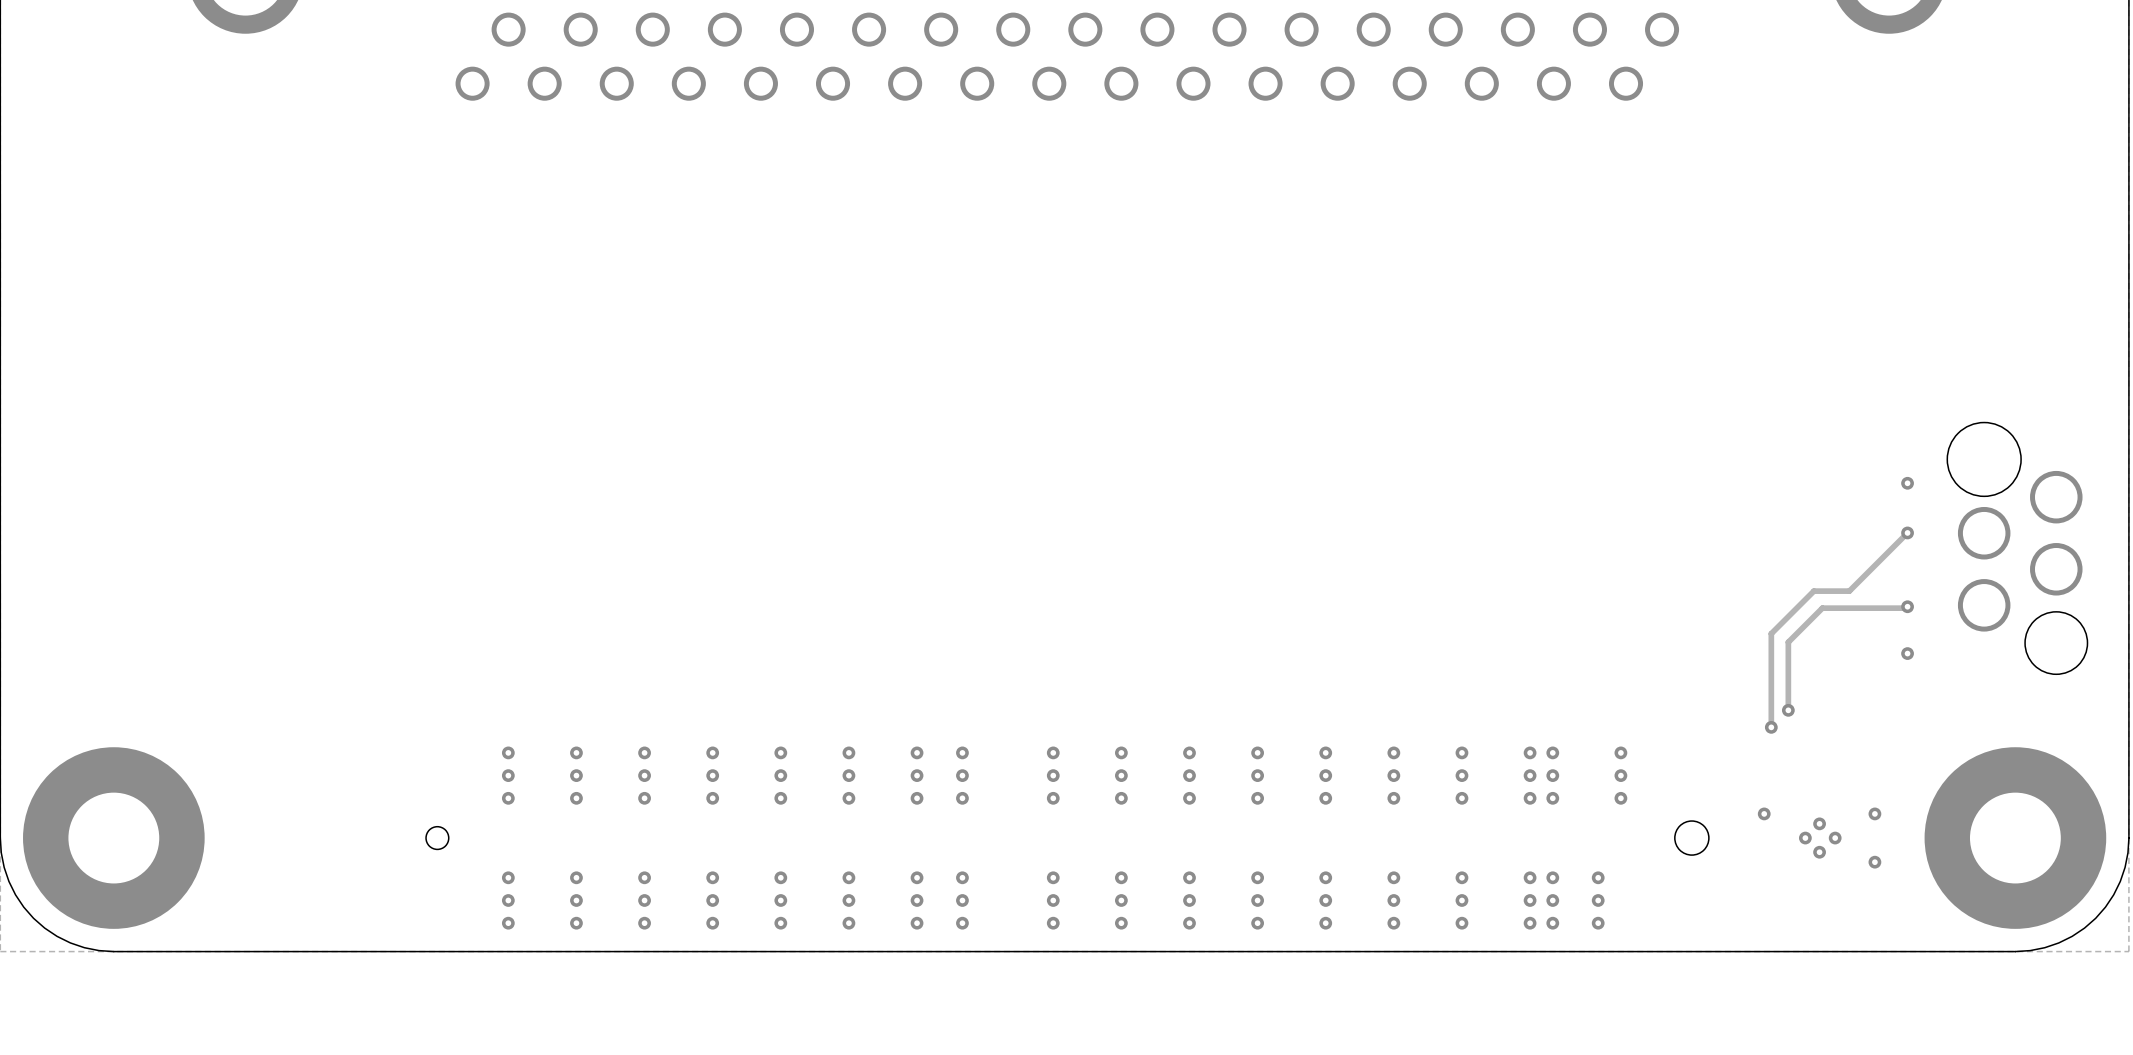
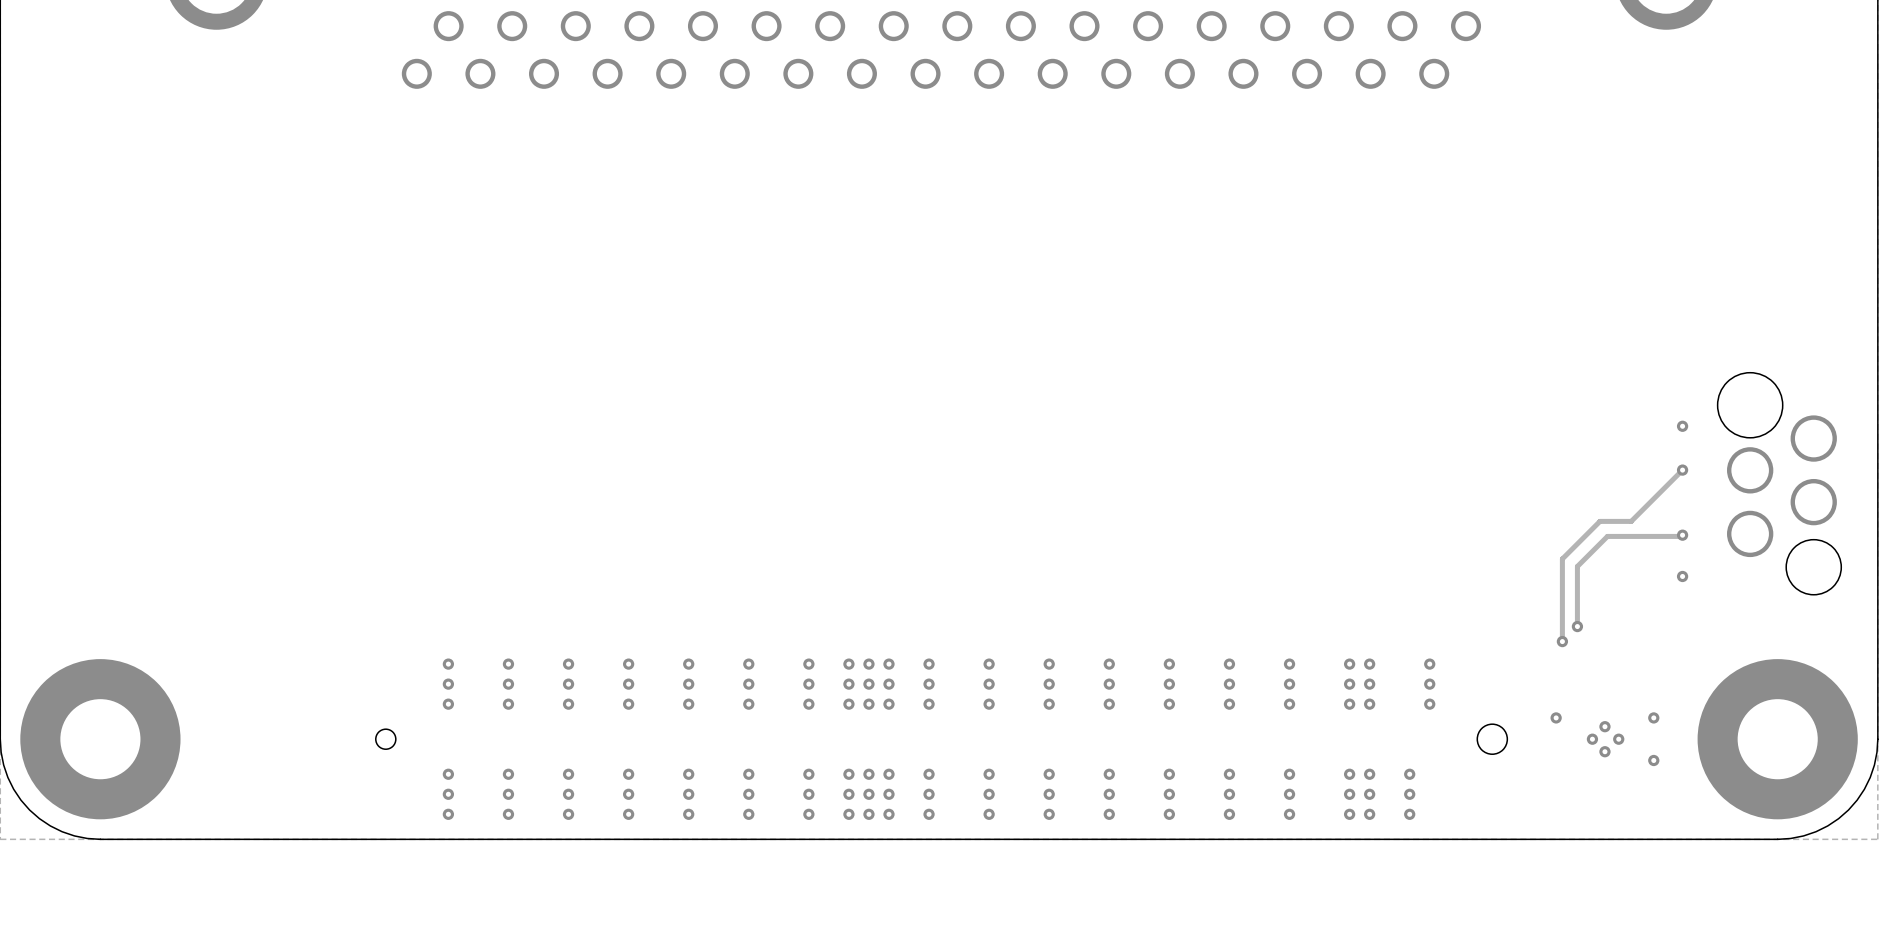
via: none -> (868, 664)
via: none -> (888, 664)
via: none -> (868, 684)
via: none -> (888, 684)
via: none -> (868, 704)
via: none -> (888, 704)
via: none -> (868, 774)
via: none -> (888, 774)
via: none -> (868, 794)
via: none -> (888, 794)
via: none -> (868, 814)
via: none -> (888, 814)

